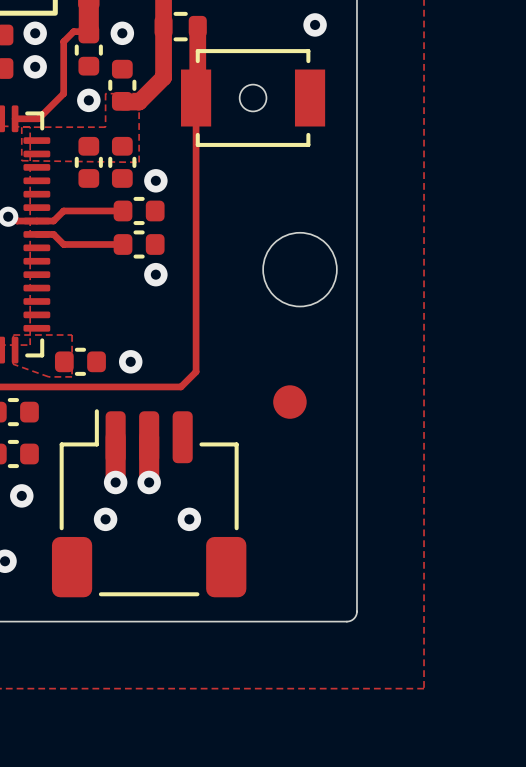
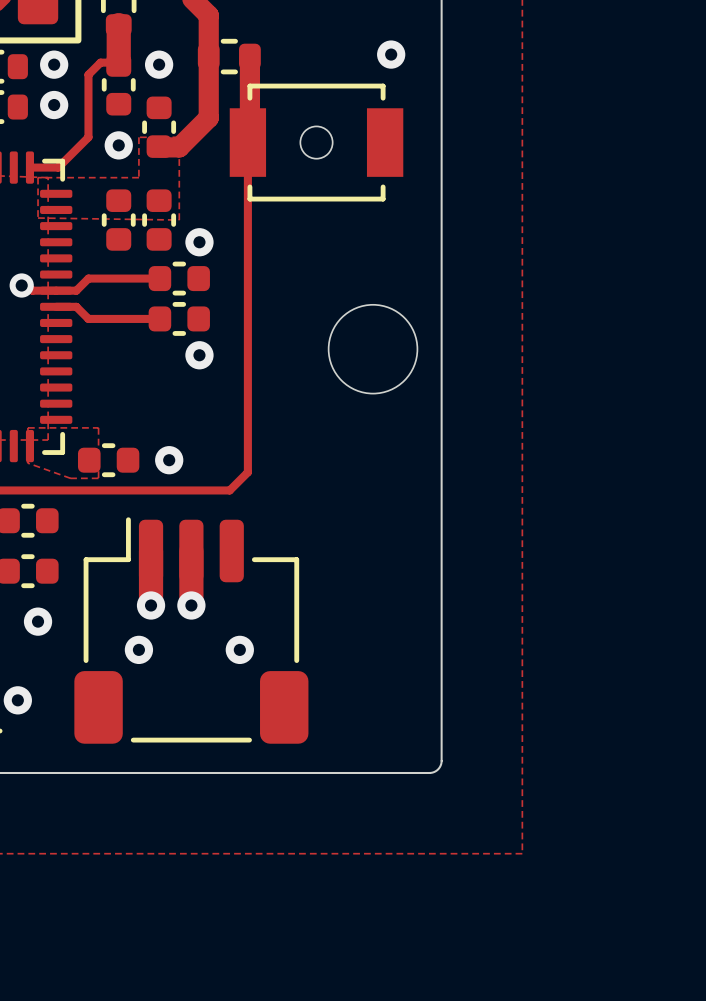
part: (289, 402) -> none

